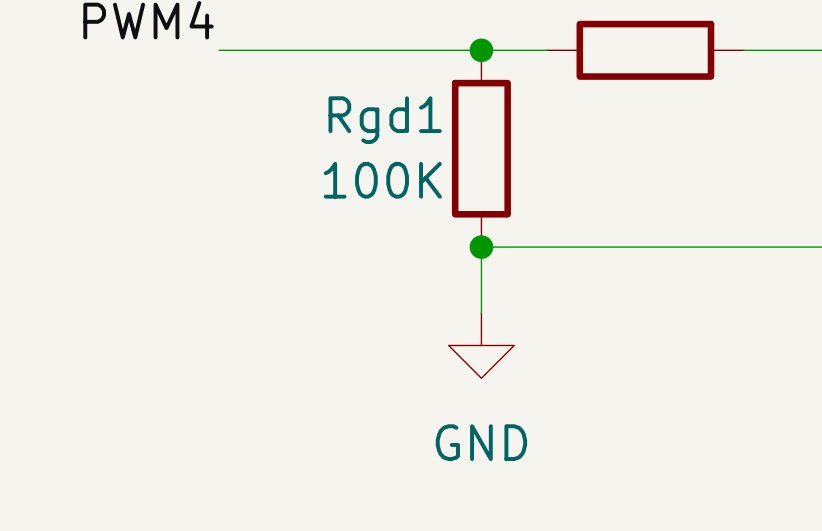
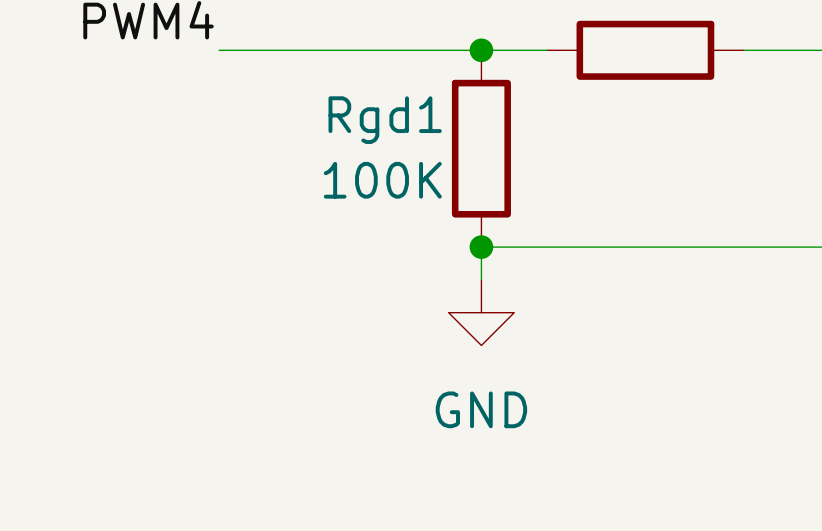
power symbol position: GND (481, 345) -> GND (481, 312)

